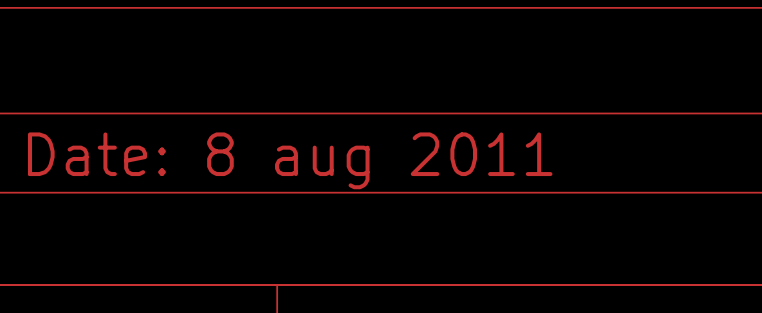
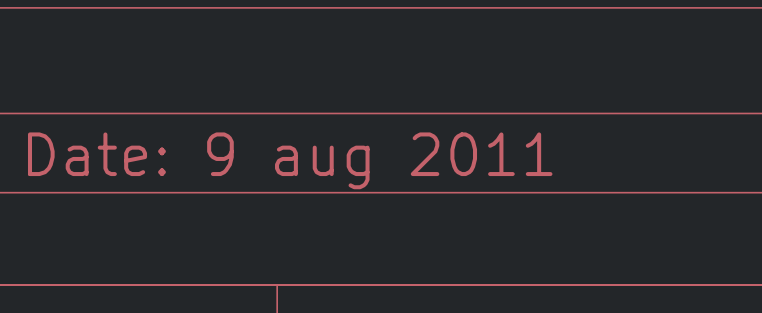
title block: Date: 8 aug 2011 (290, 160) -> Date: 9 aug 2011 (290, 160)

